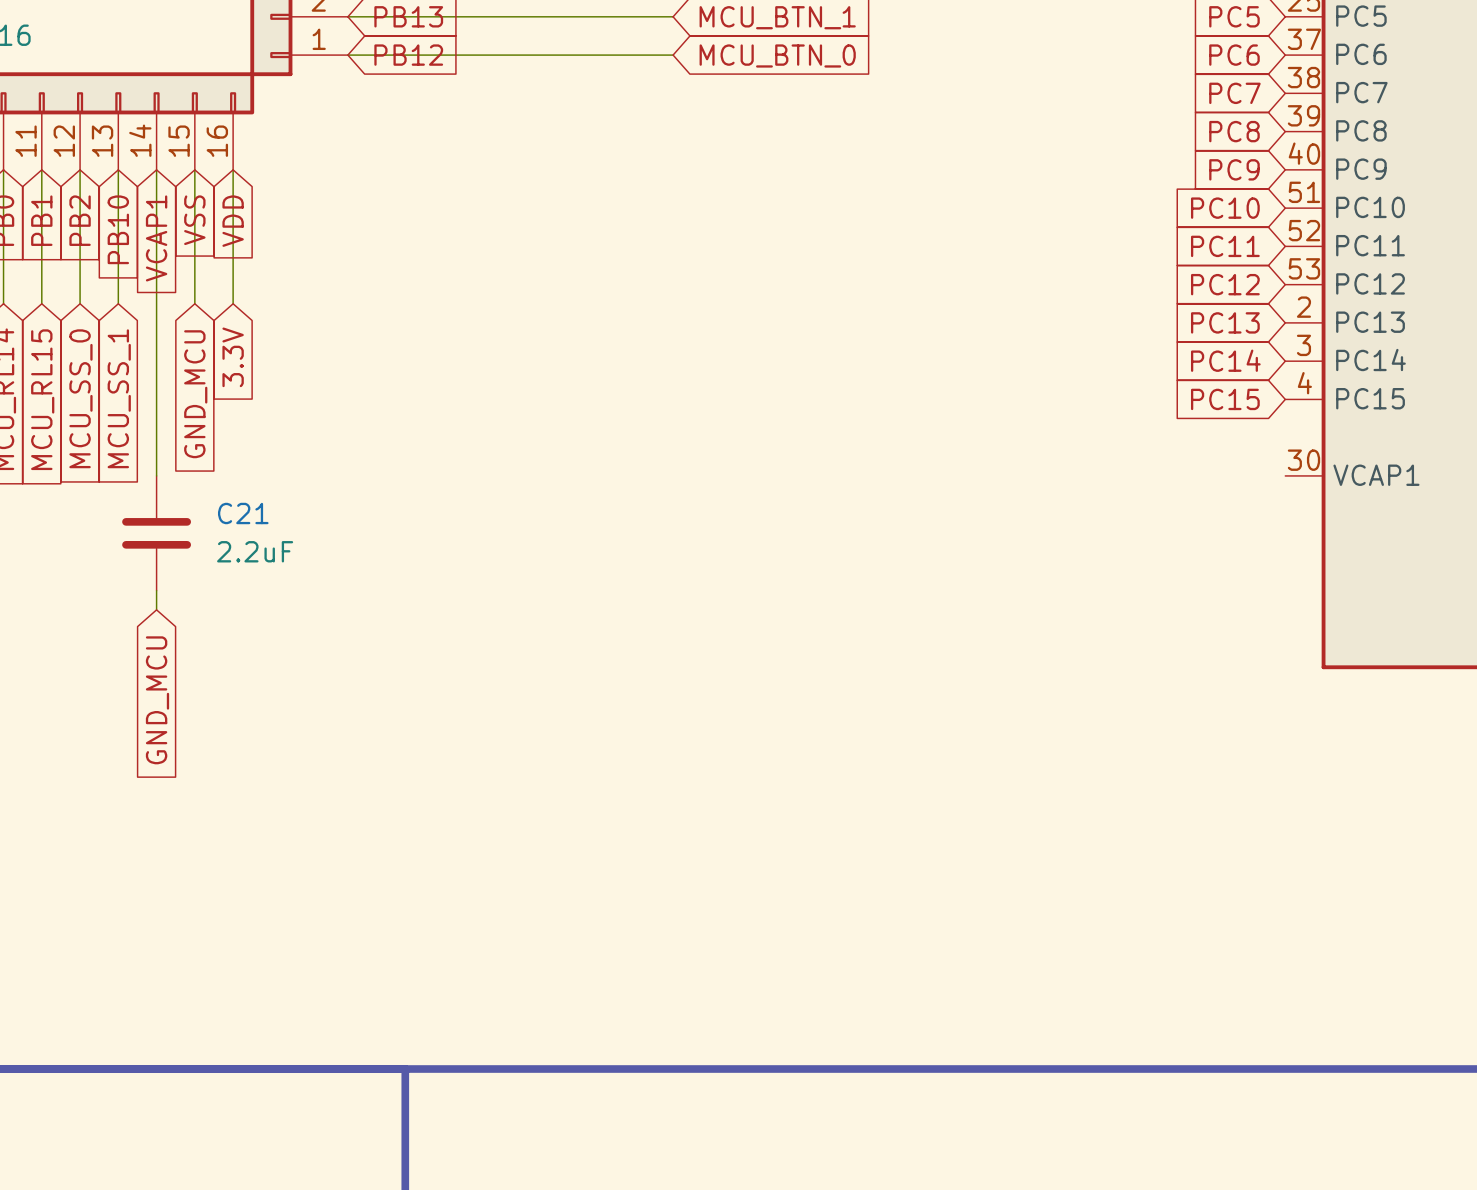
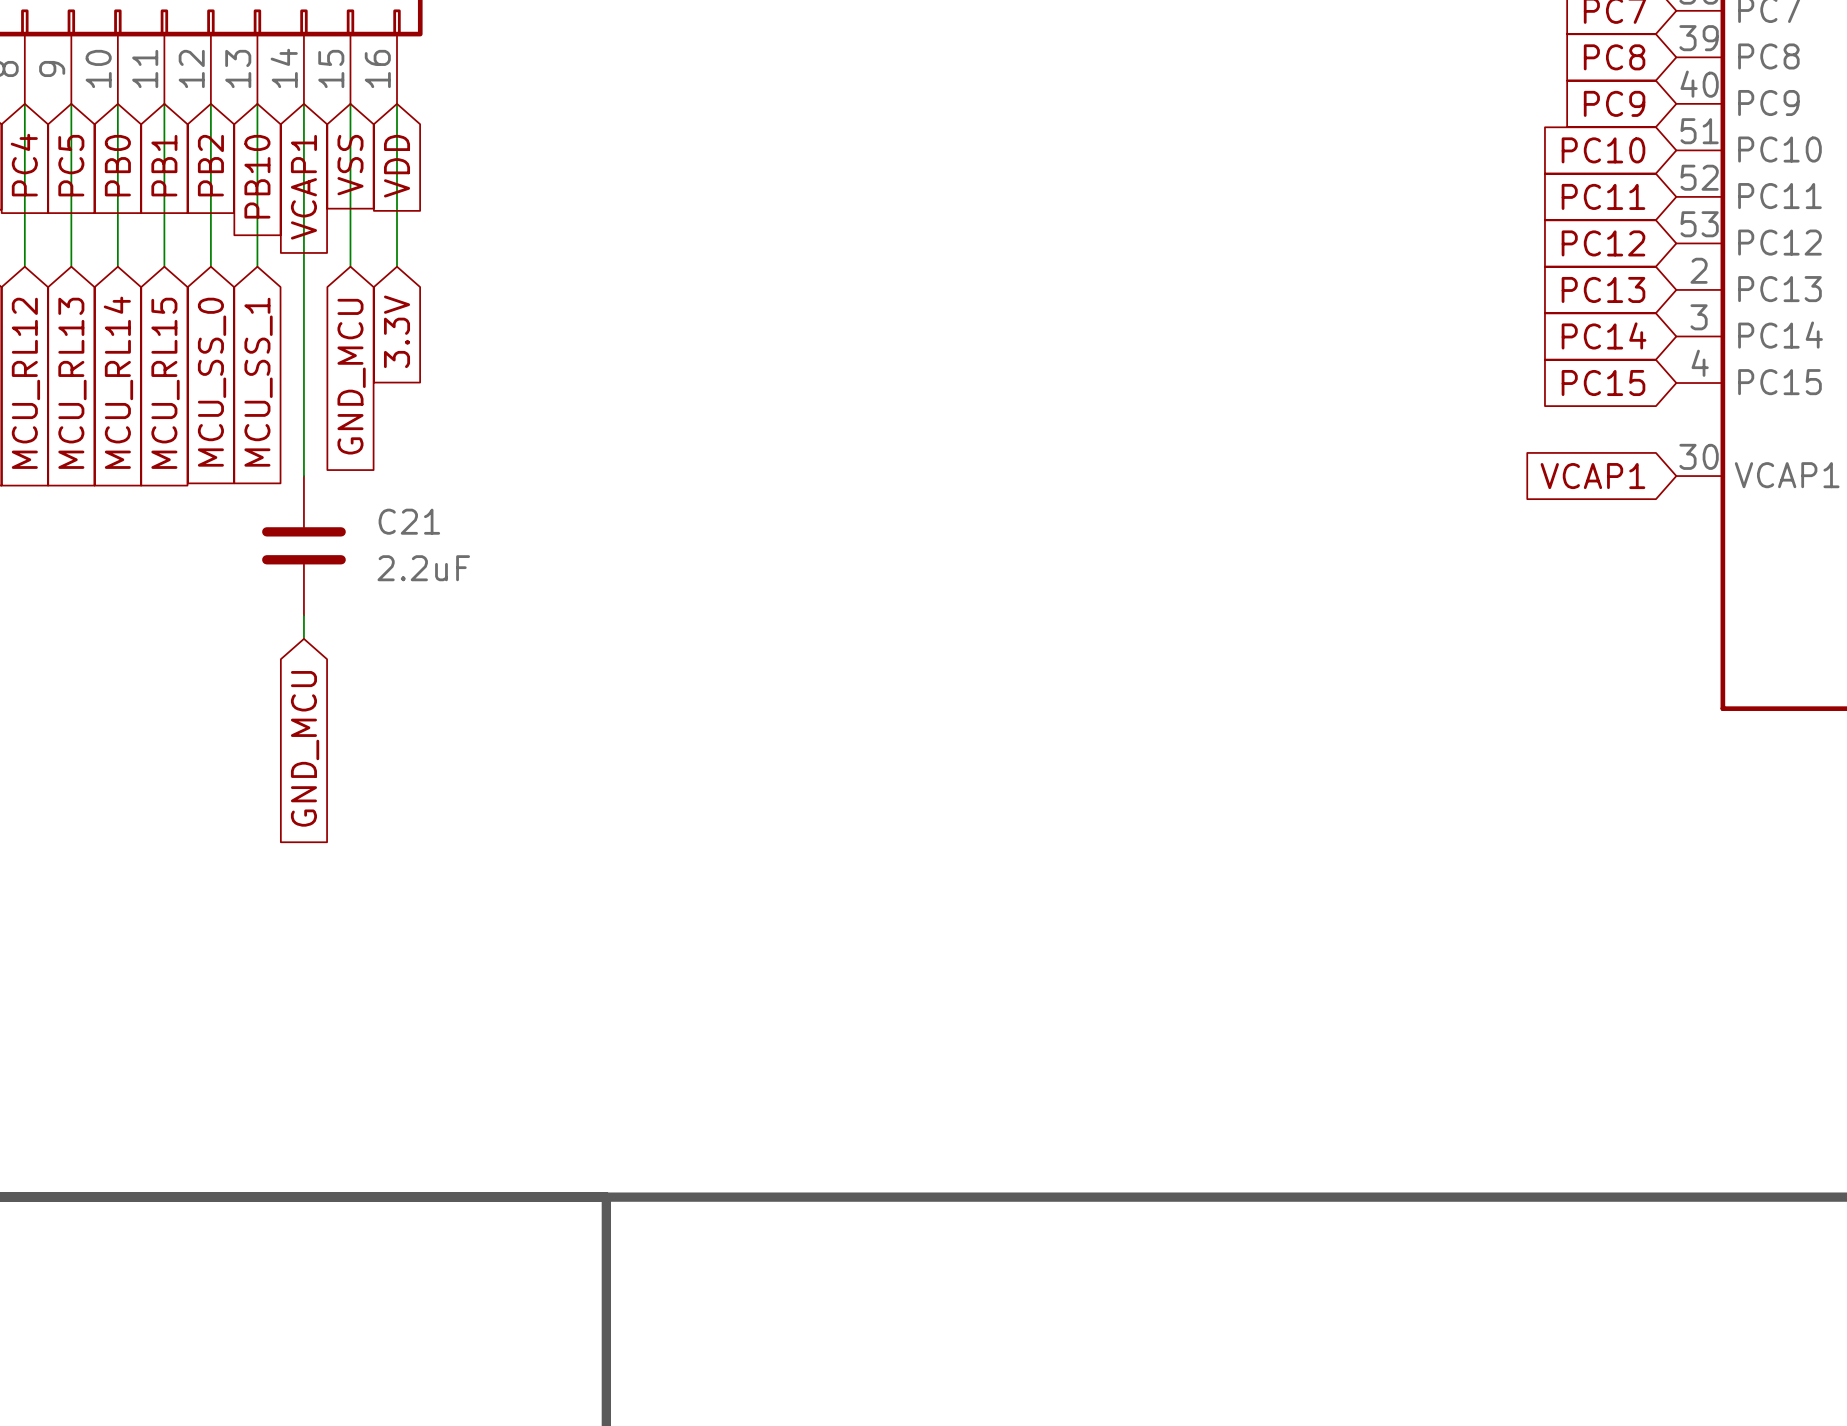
global label: none -> VCAP1 (1592, 476)

